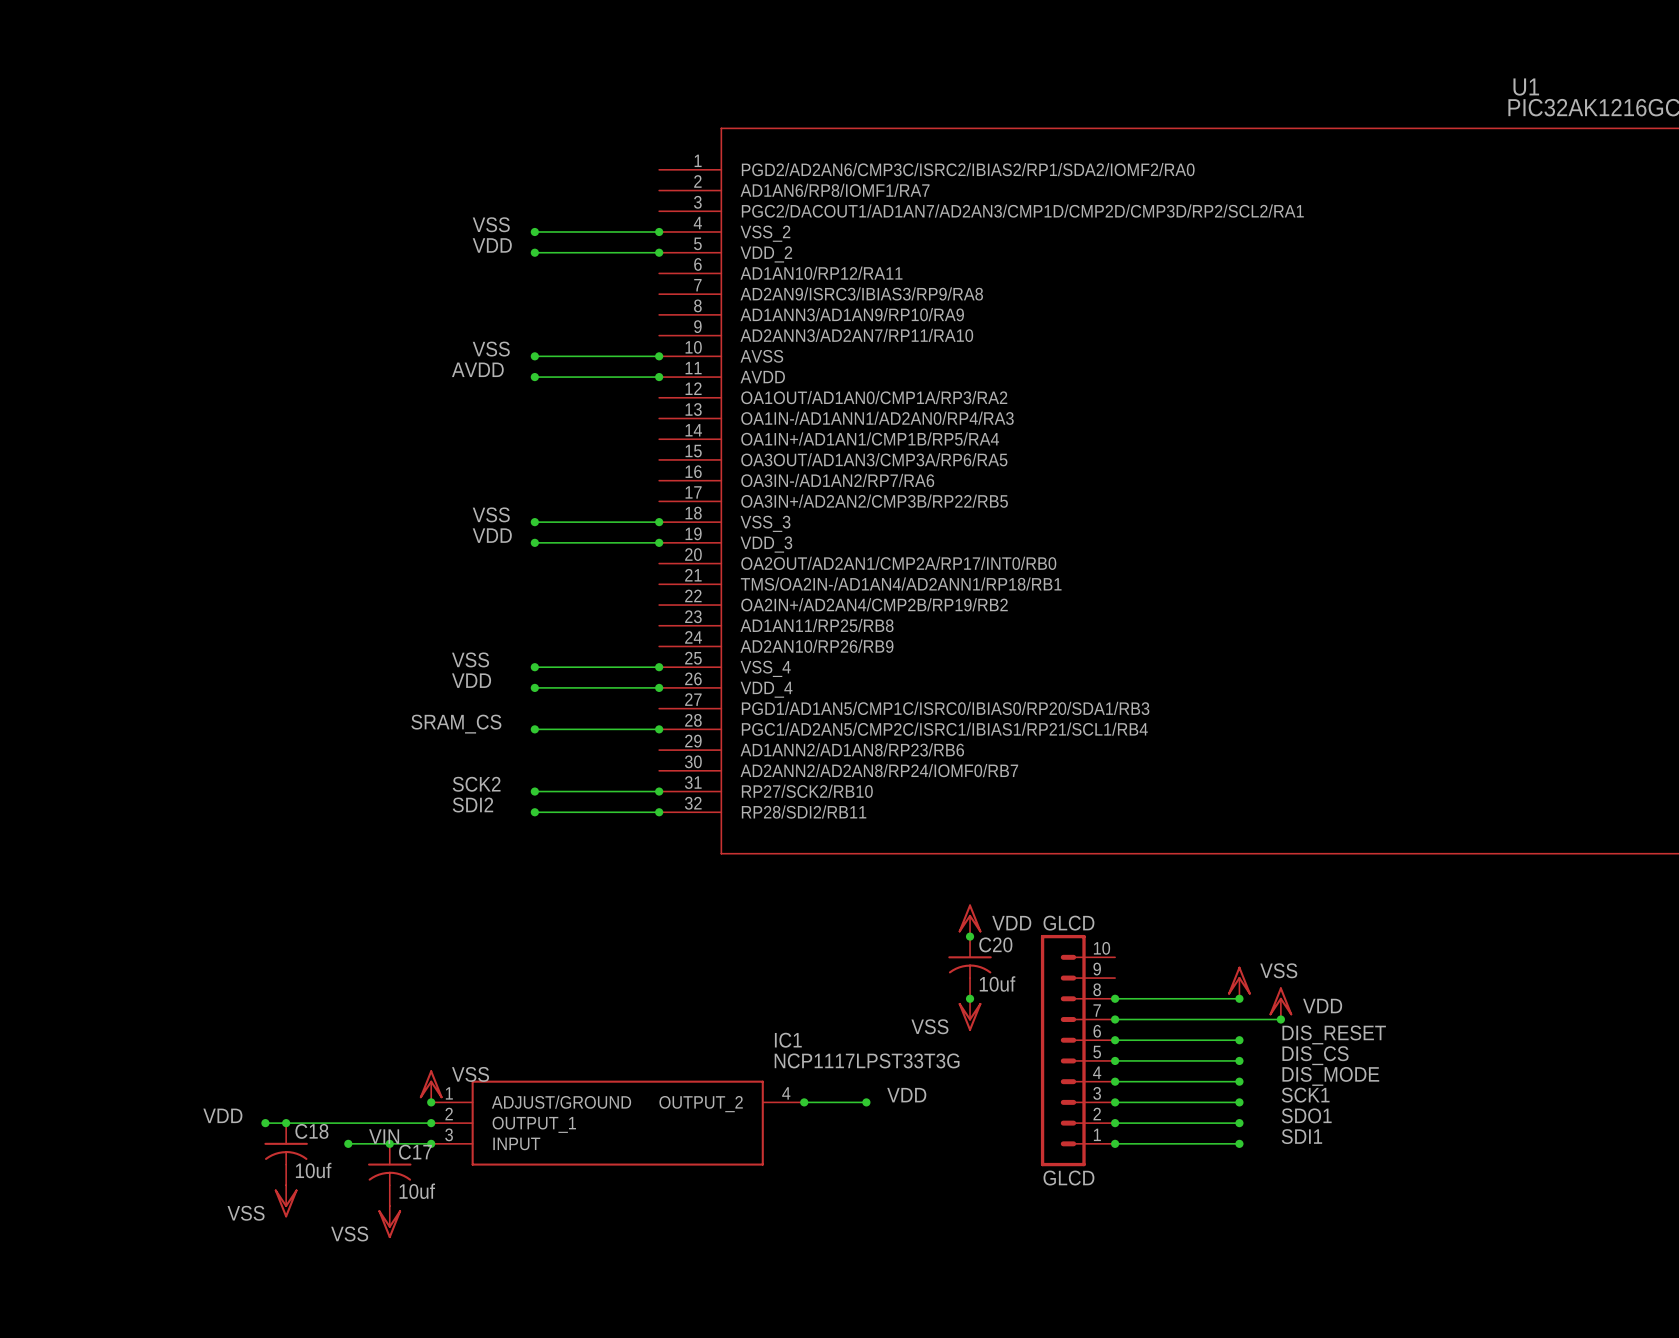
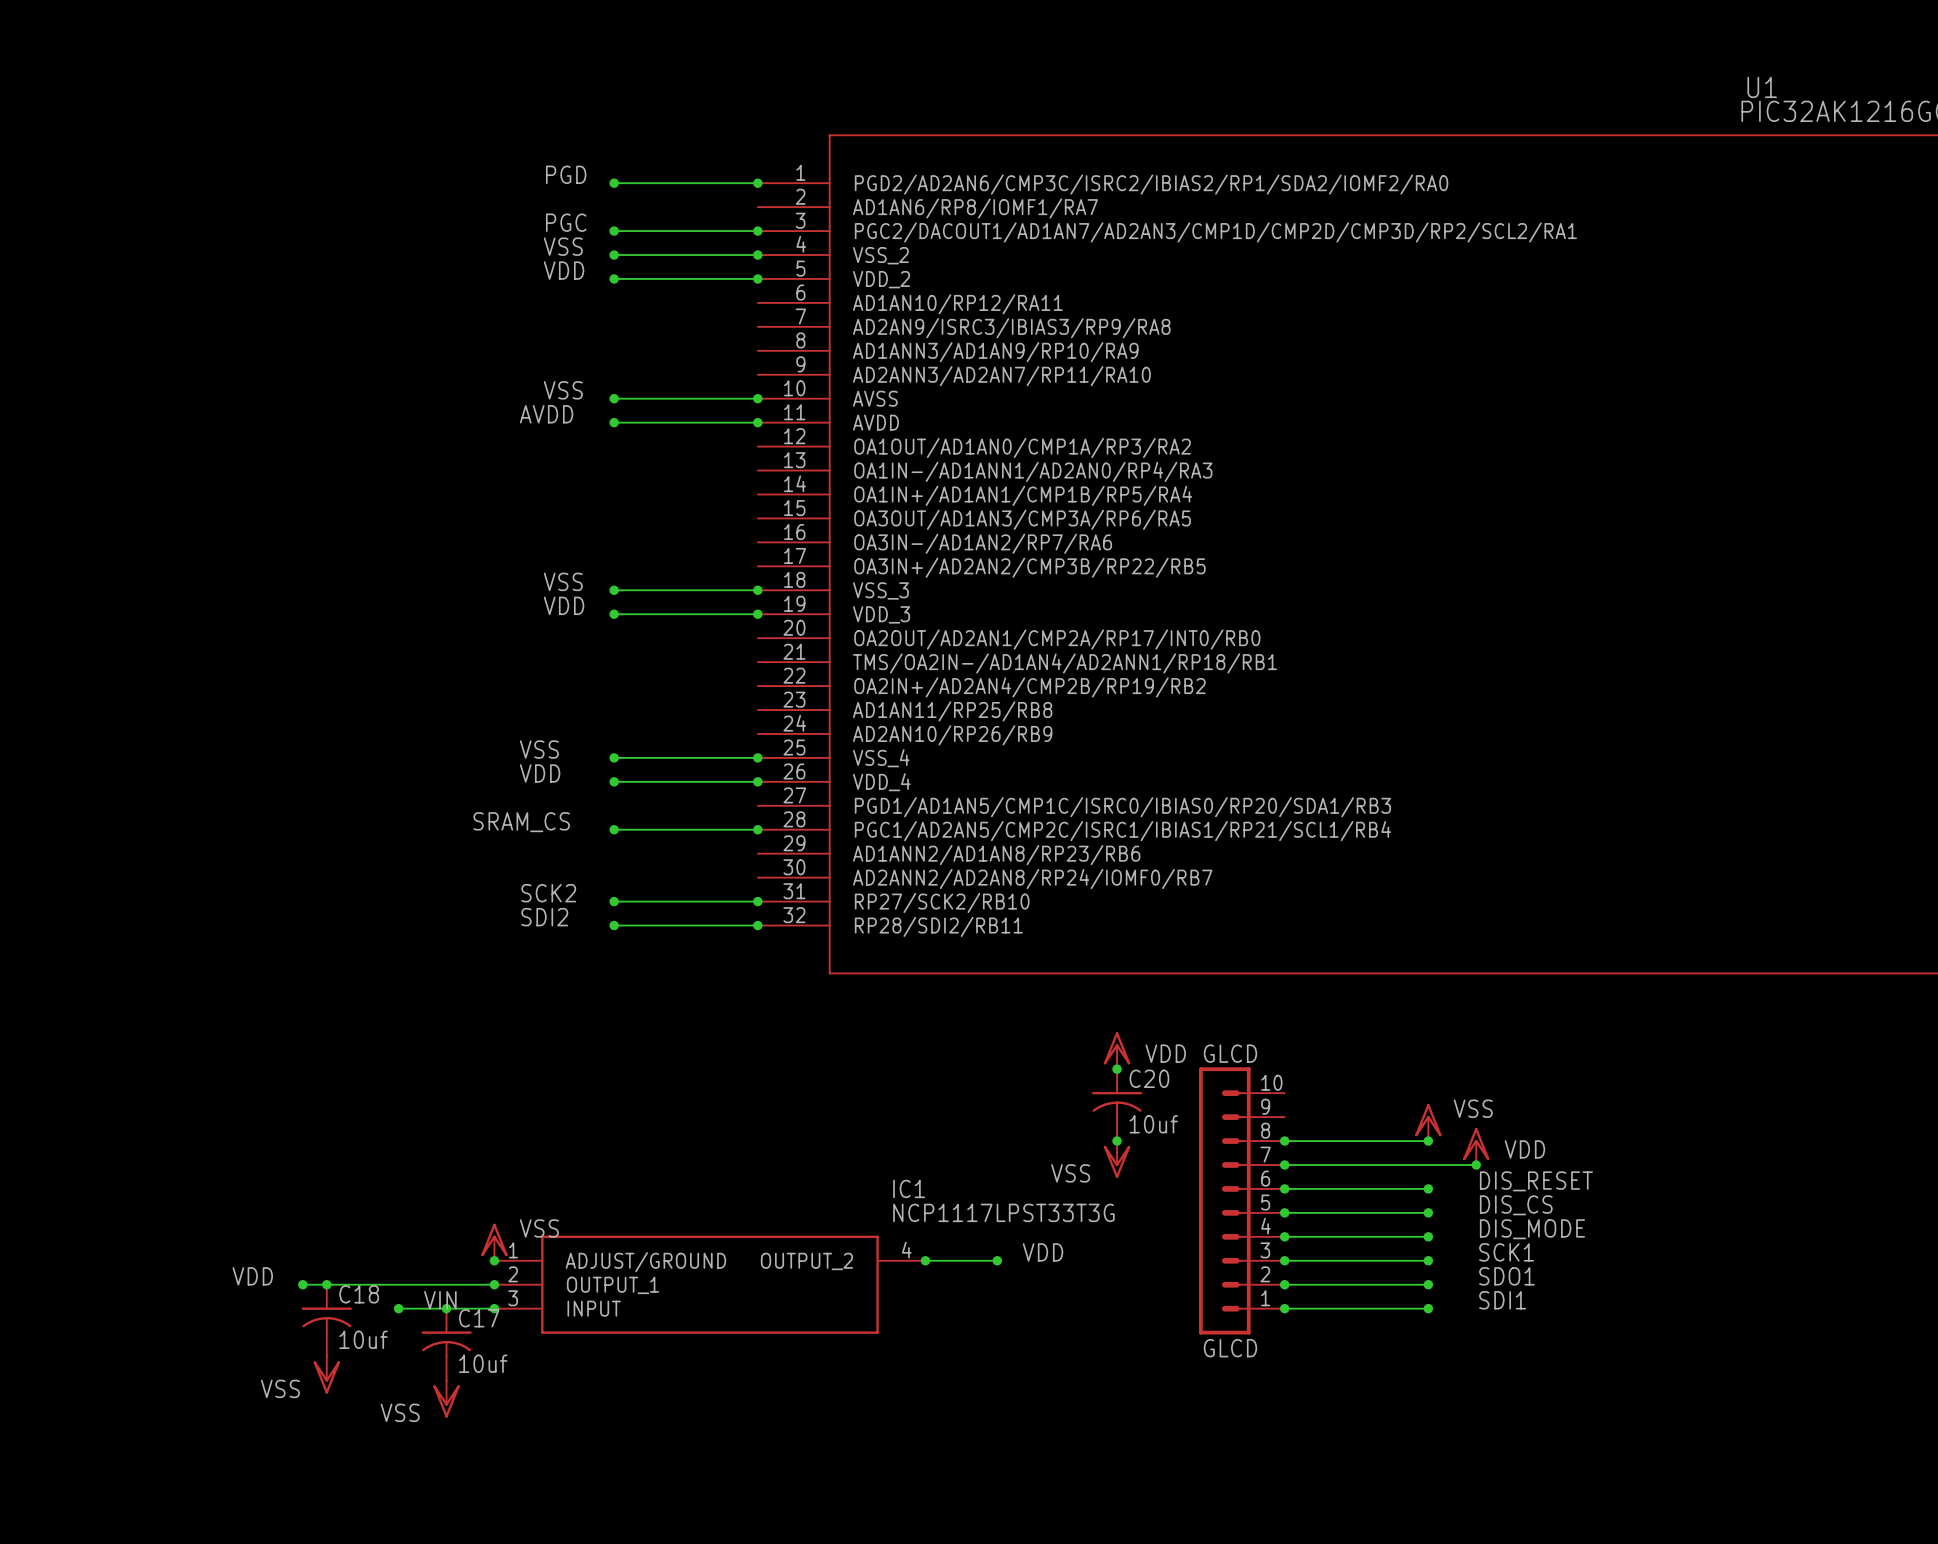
label: none -> PGD (566, 174)
wire: none -> (614, 183) (757, 183)
junction: none -> (614, 183)
junction: none -> (757, 183)
label: none -> PGC (566, 222)
wire: none -> (614, 231) (757, 231)
junction: none -> (614, 231)
junction: none -> (757, 231)

